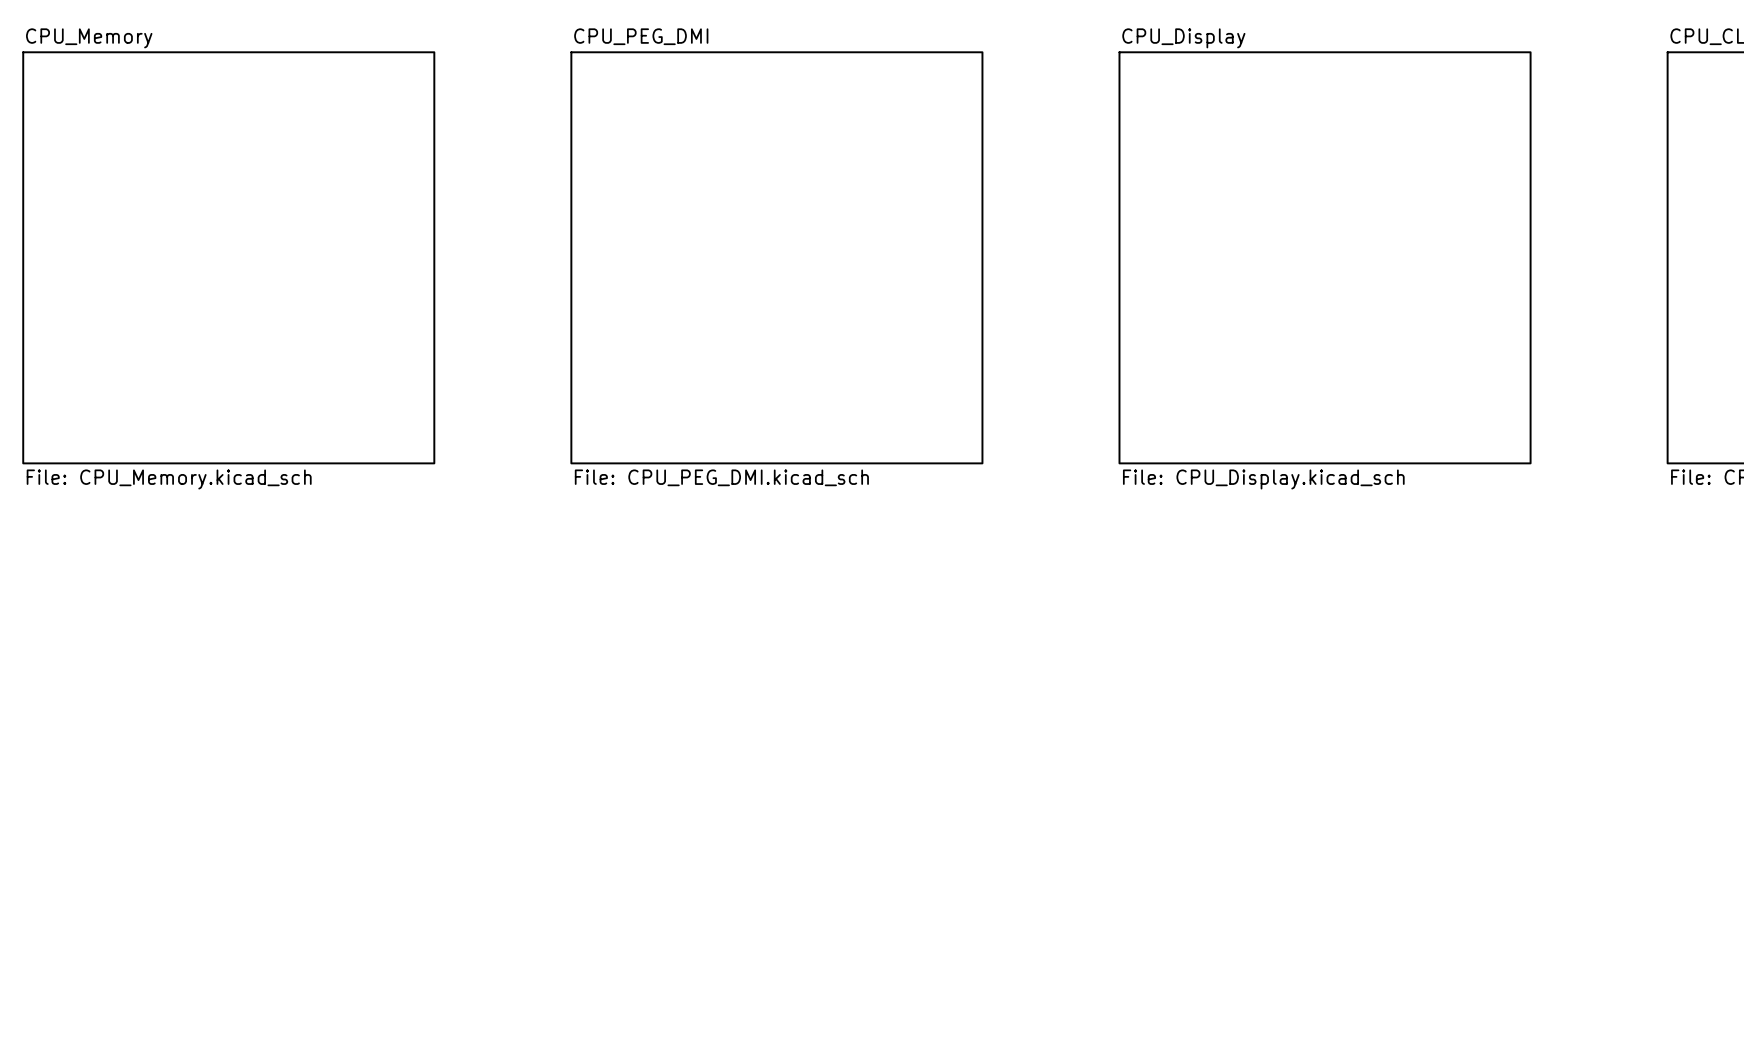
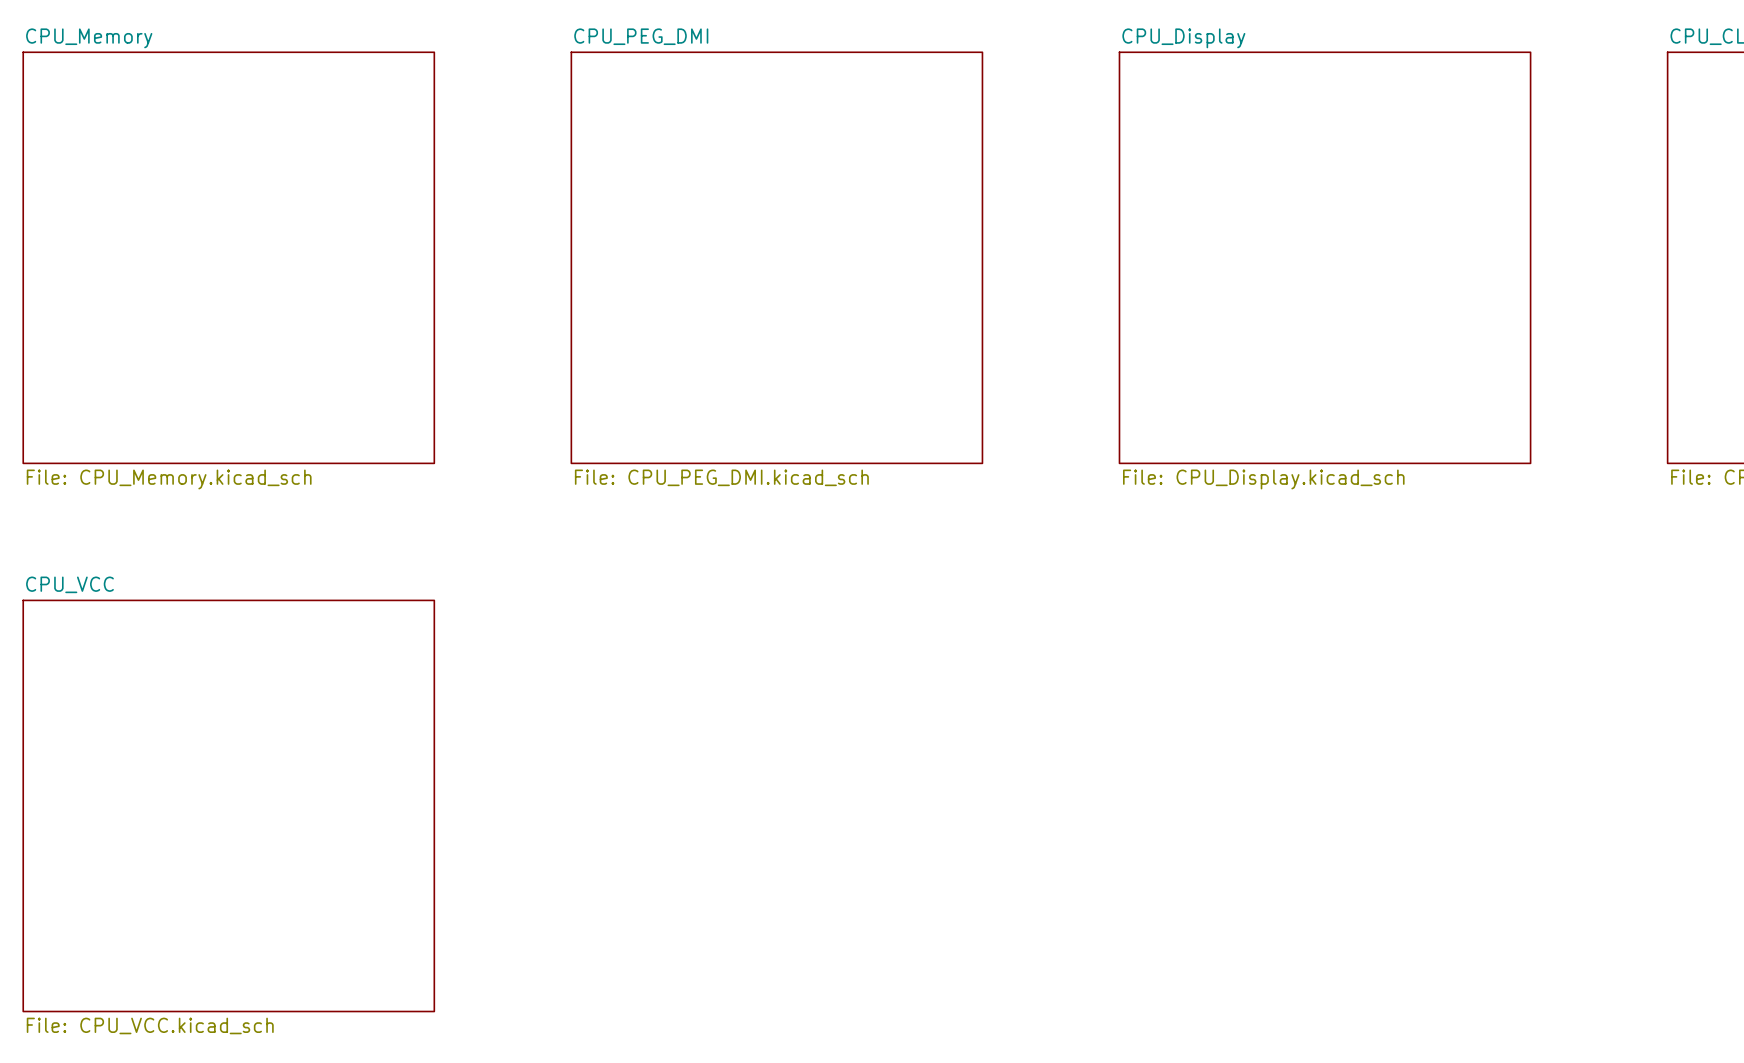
sheet CPU_VCC: none -> File: CPU_VCC.kicad_sch (228, 805)

